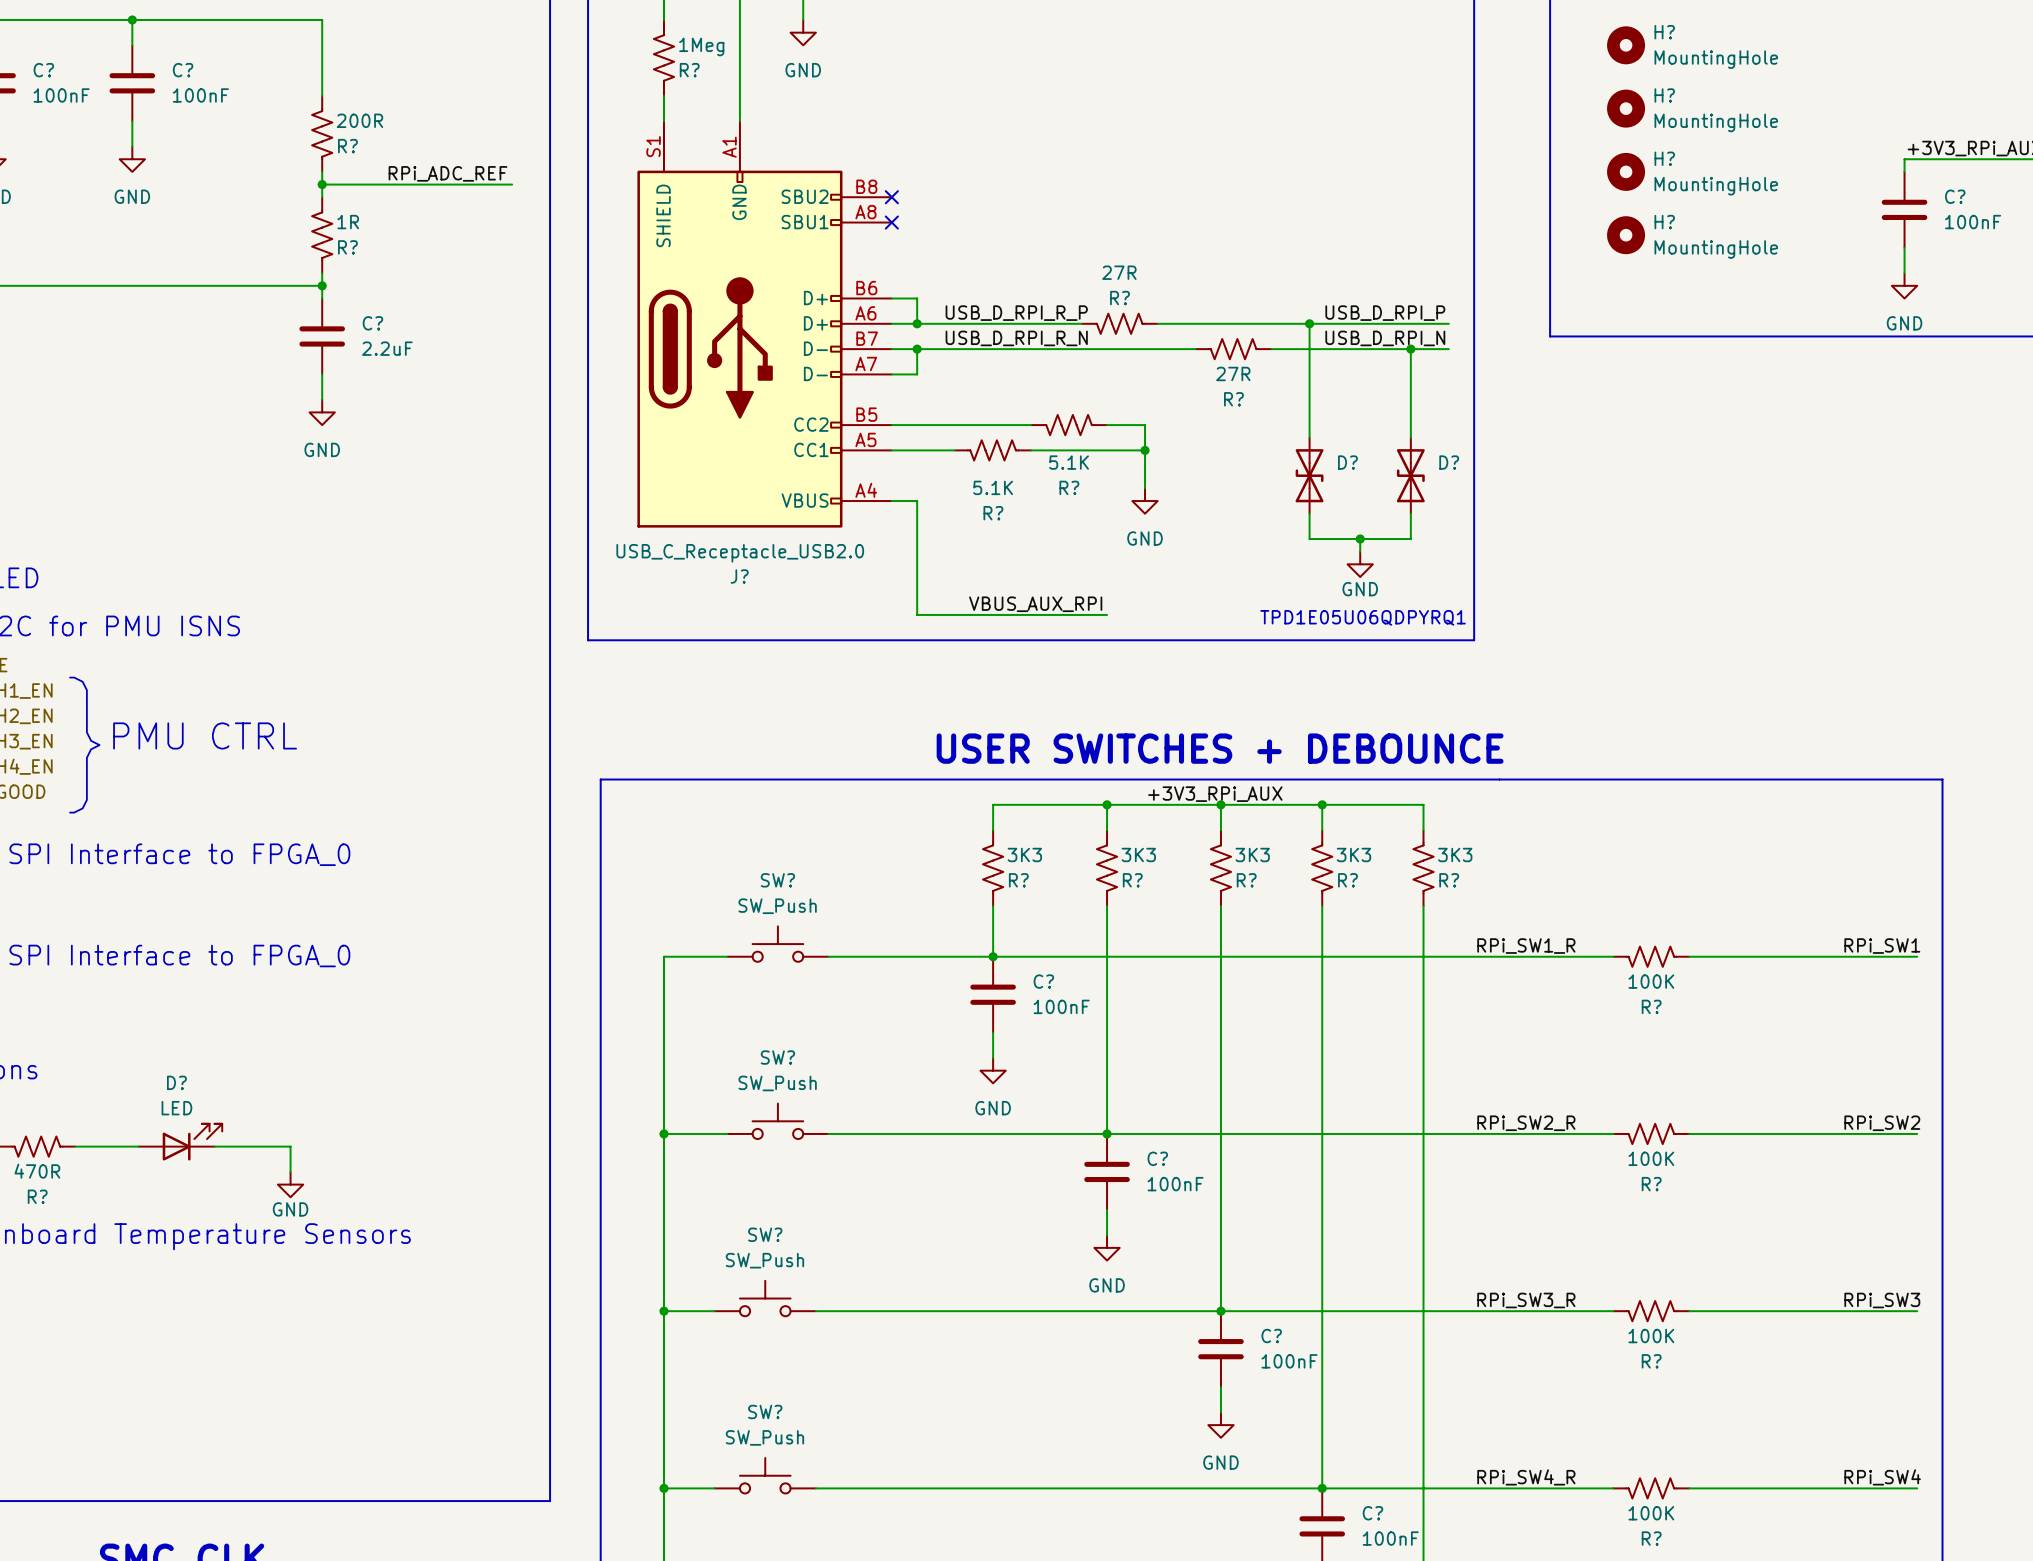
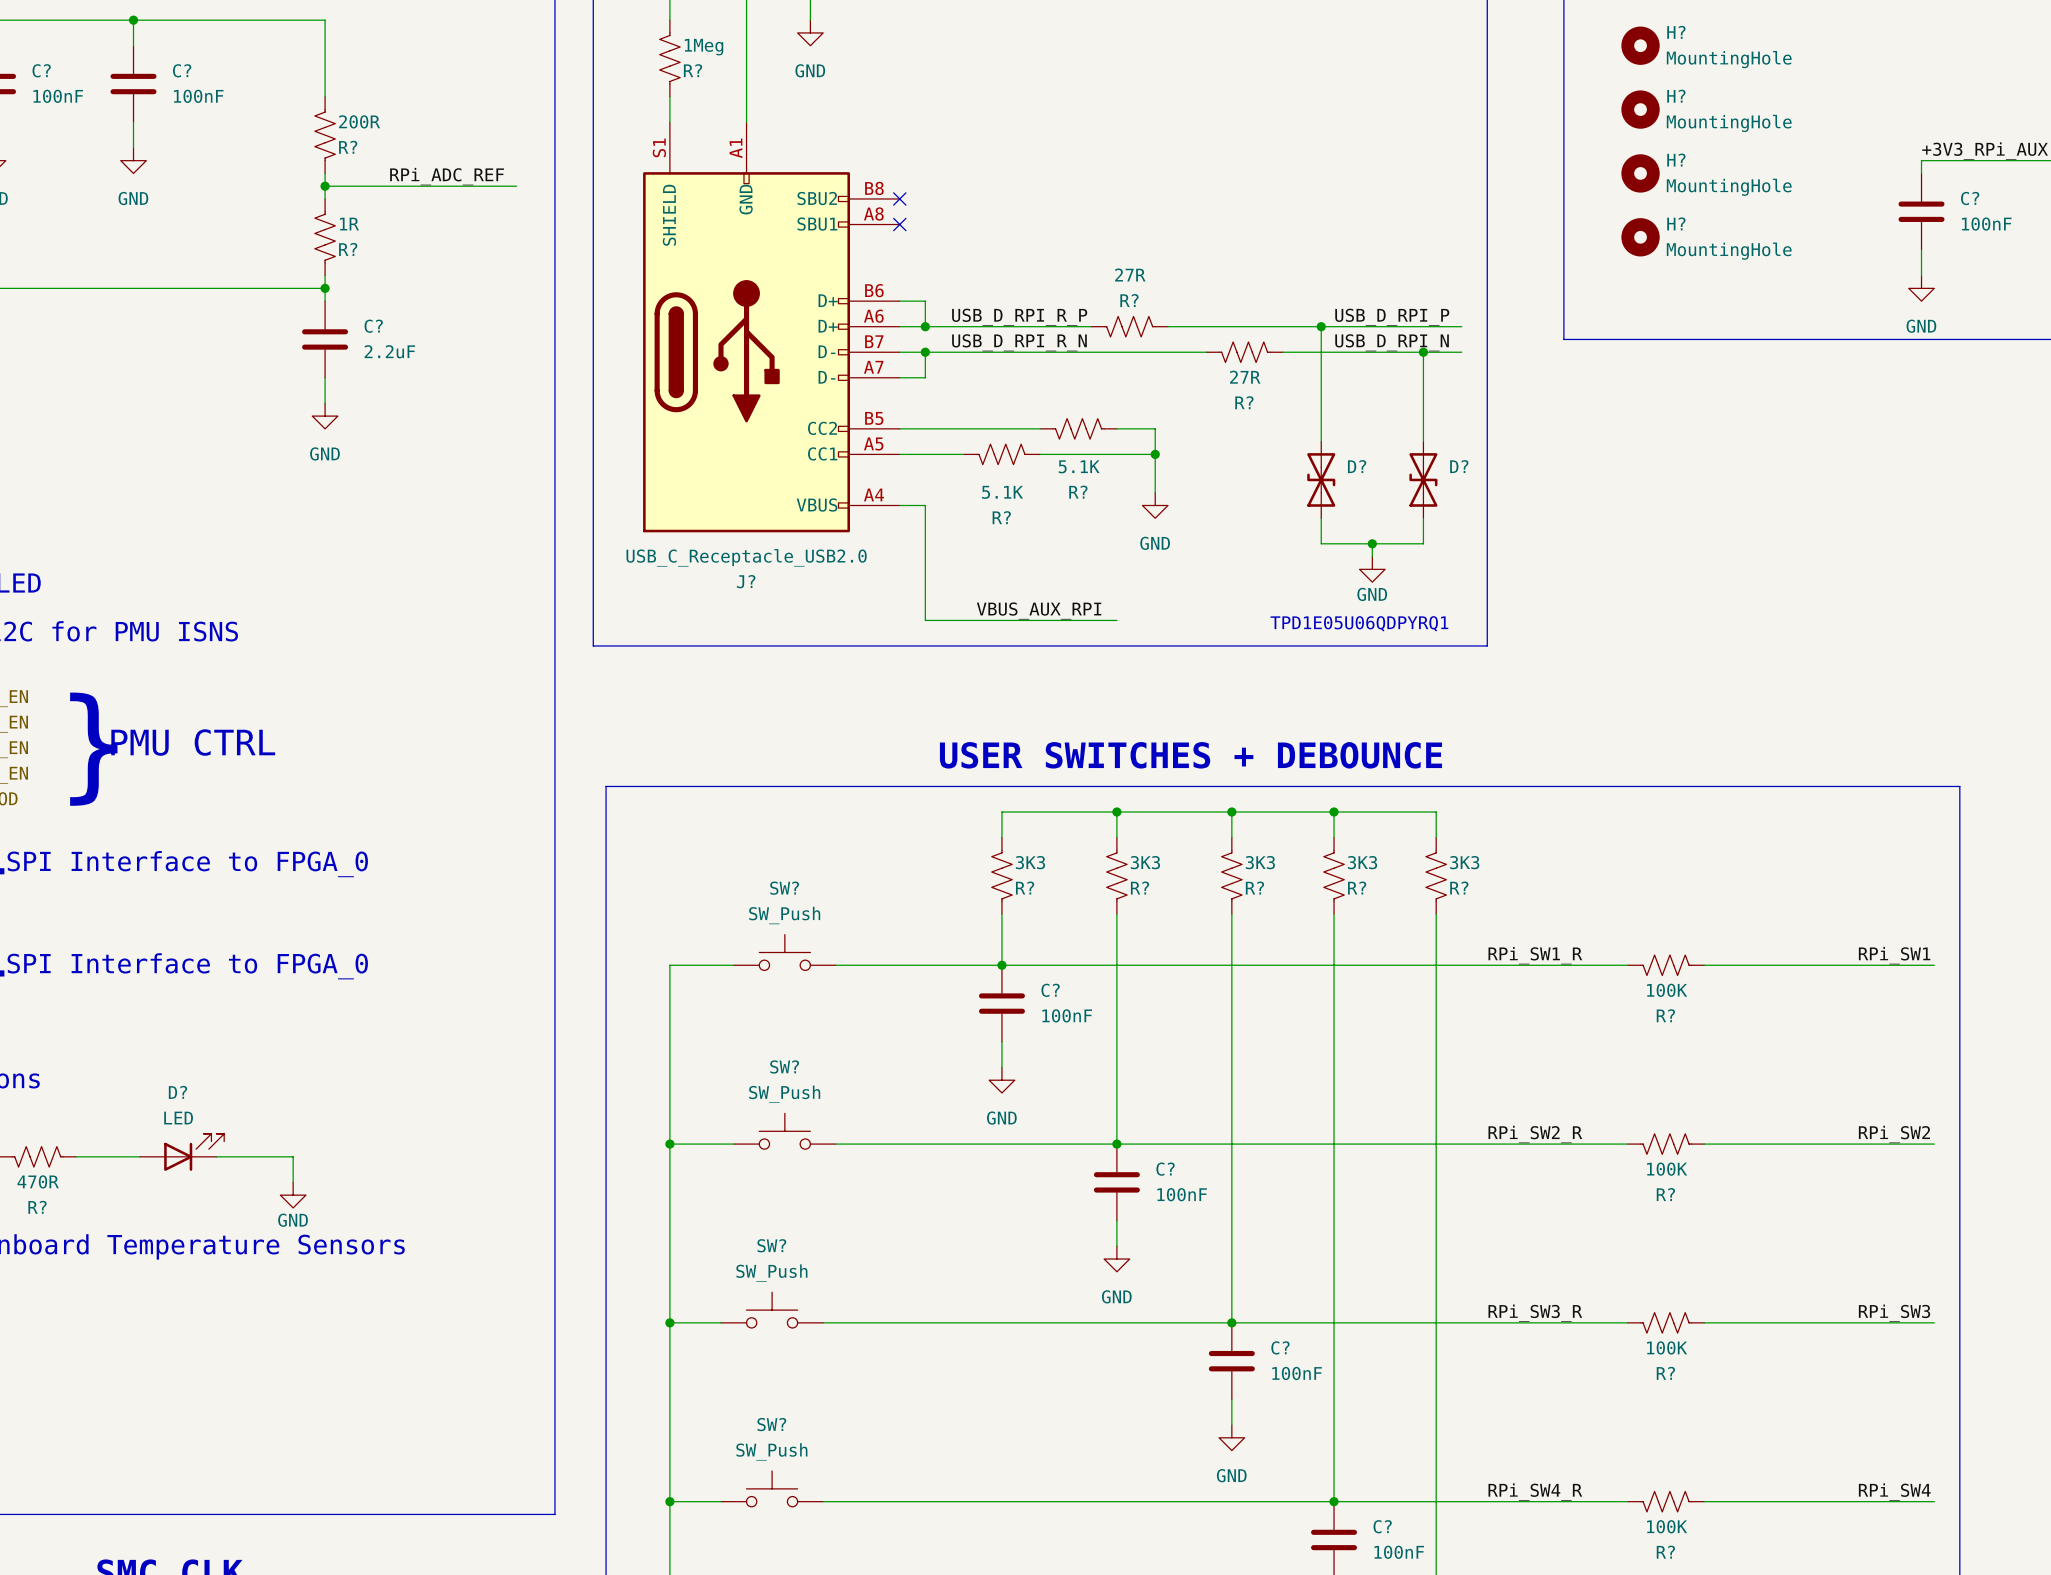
label: +3V3_RPi_AUX (1215, 794) -> none

